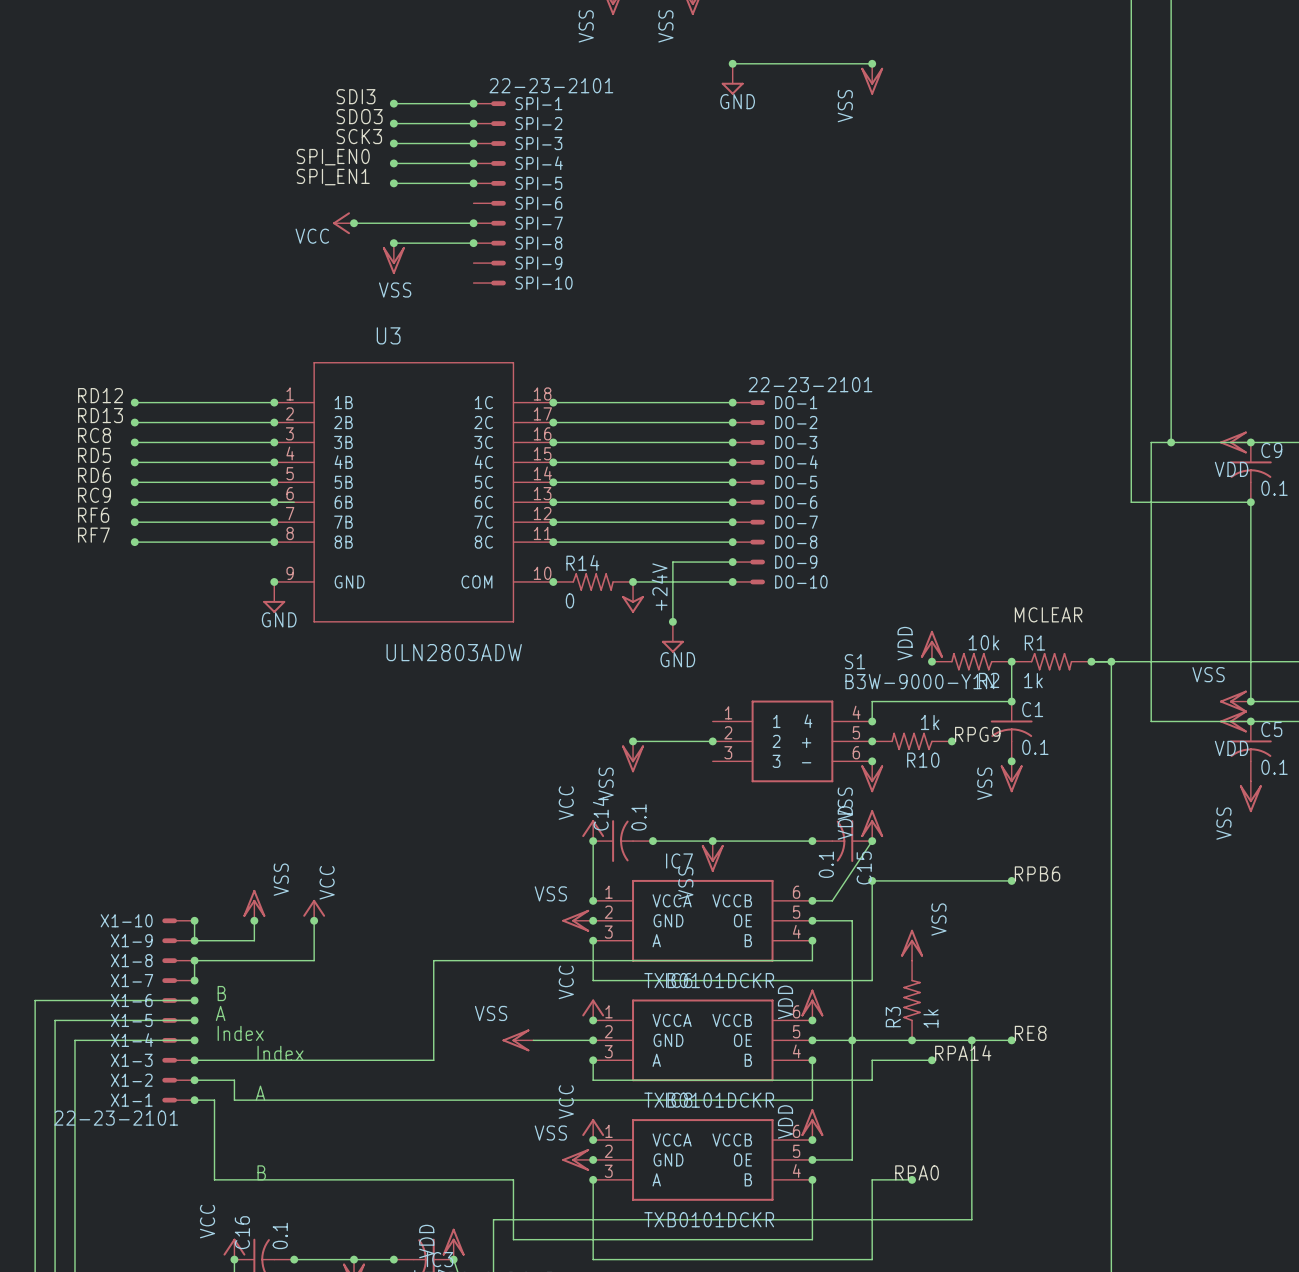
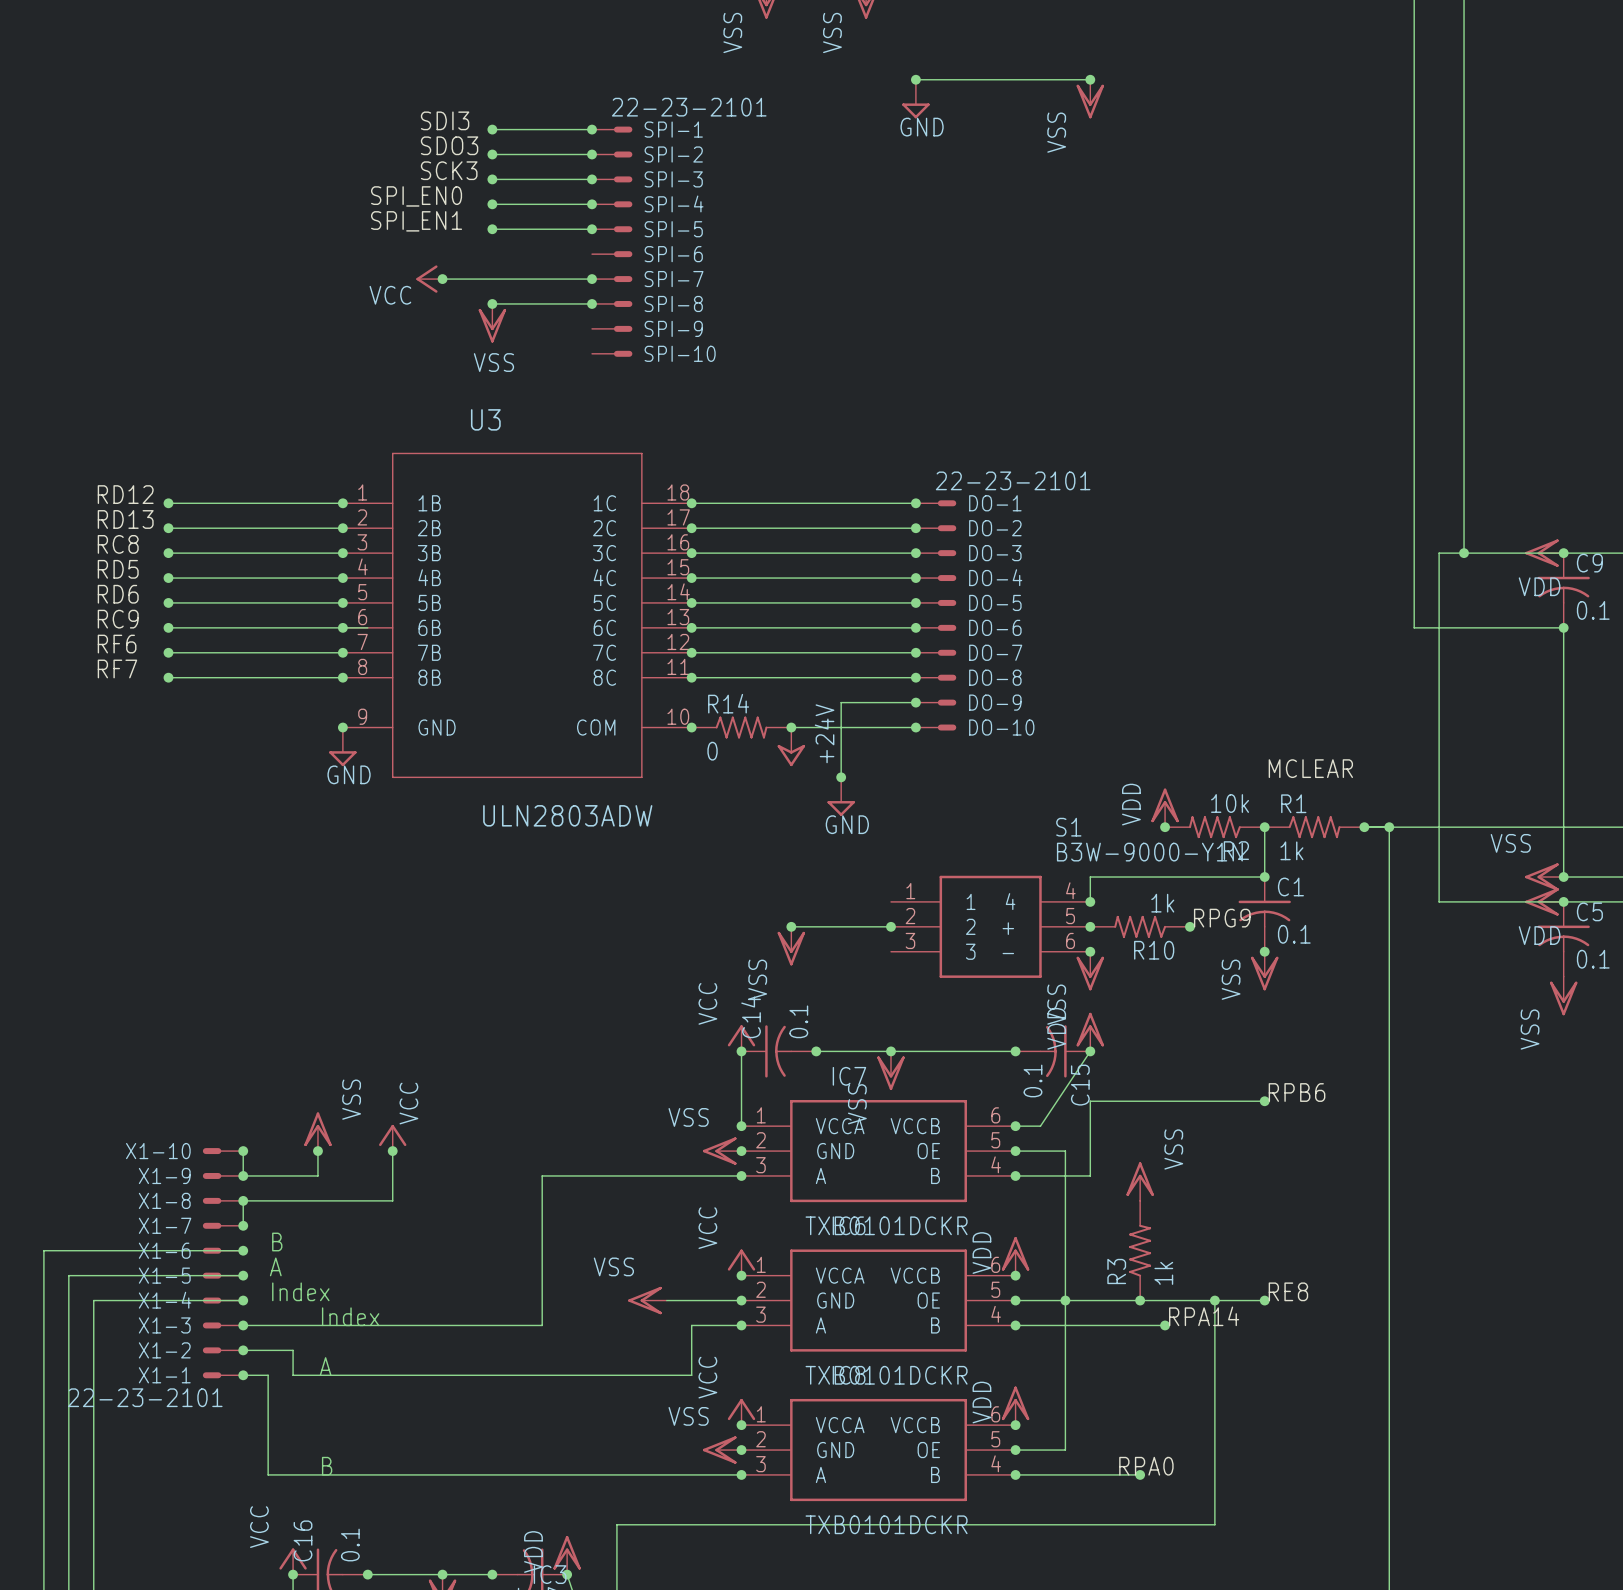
junction: (872, 880) -> none
wire: (593, 940) (593, 980) (872, 980) (872, 940) -> (1015, 1175) (1090, 1175)
wire: (812, 940) (812, 960) (433, 960) -> (741, 1175) (542, 1175) (542, 1200)
wire: (593, 1060) (593, 1080) (872, 1080) (872, 1060) -> (1015, 1325) (1090, 1325)
wire: (812, 1060) (812, 1100) (553, 1100) -> (741, 1325) (691, 1325) (691, 1375)
wire: (513, 1179) (513, 1239) (812, 1239) (812, 1179) -> (641, 1474) (741, 1474)
wire: (593, 1179) (593, 1259) (872, 1259) (872, 1179) -> (1015, 1474) (1090, 1474)

